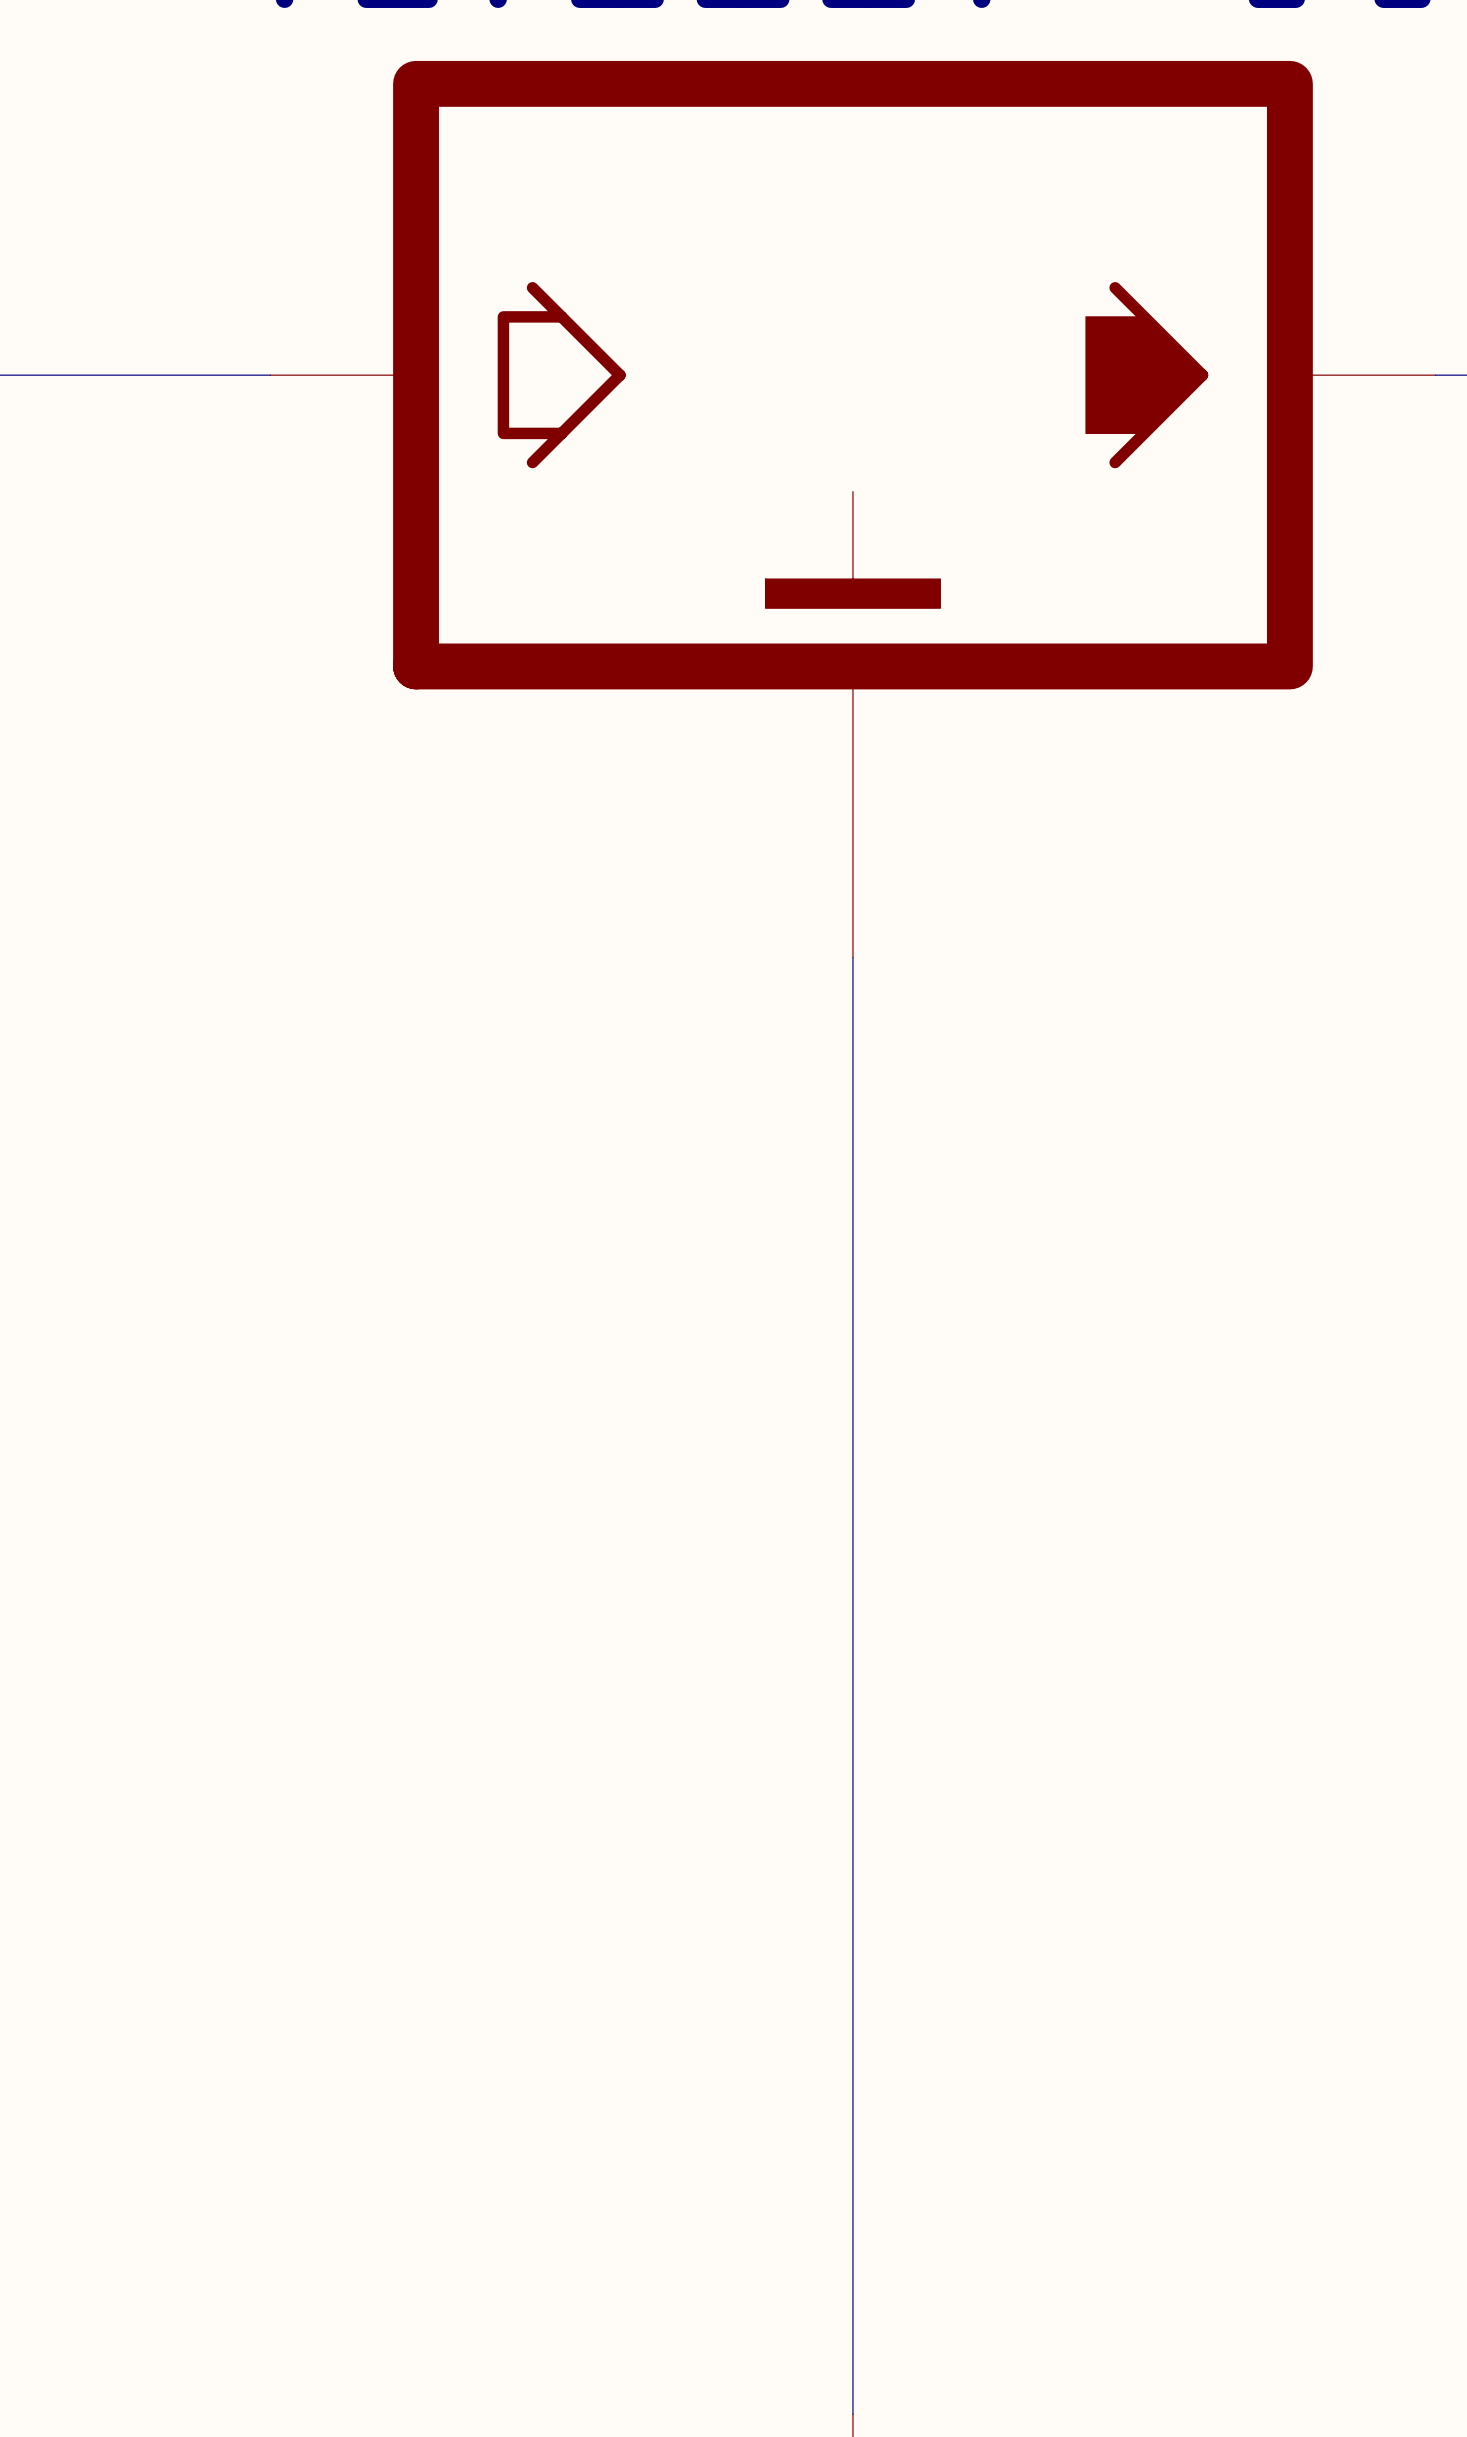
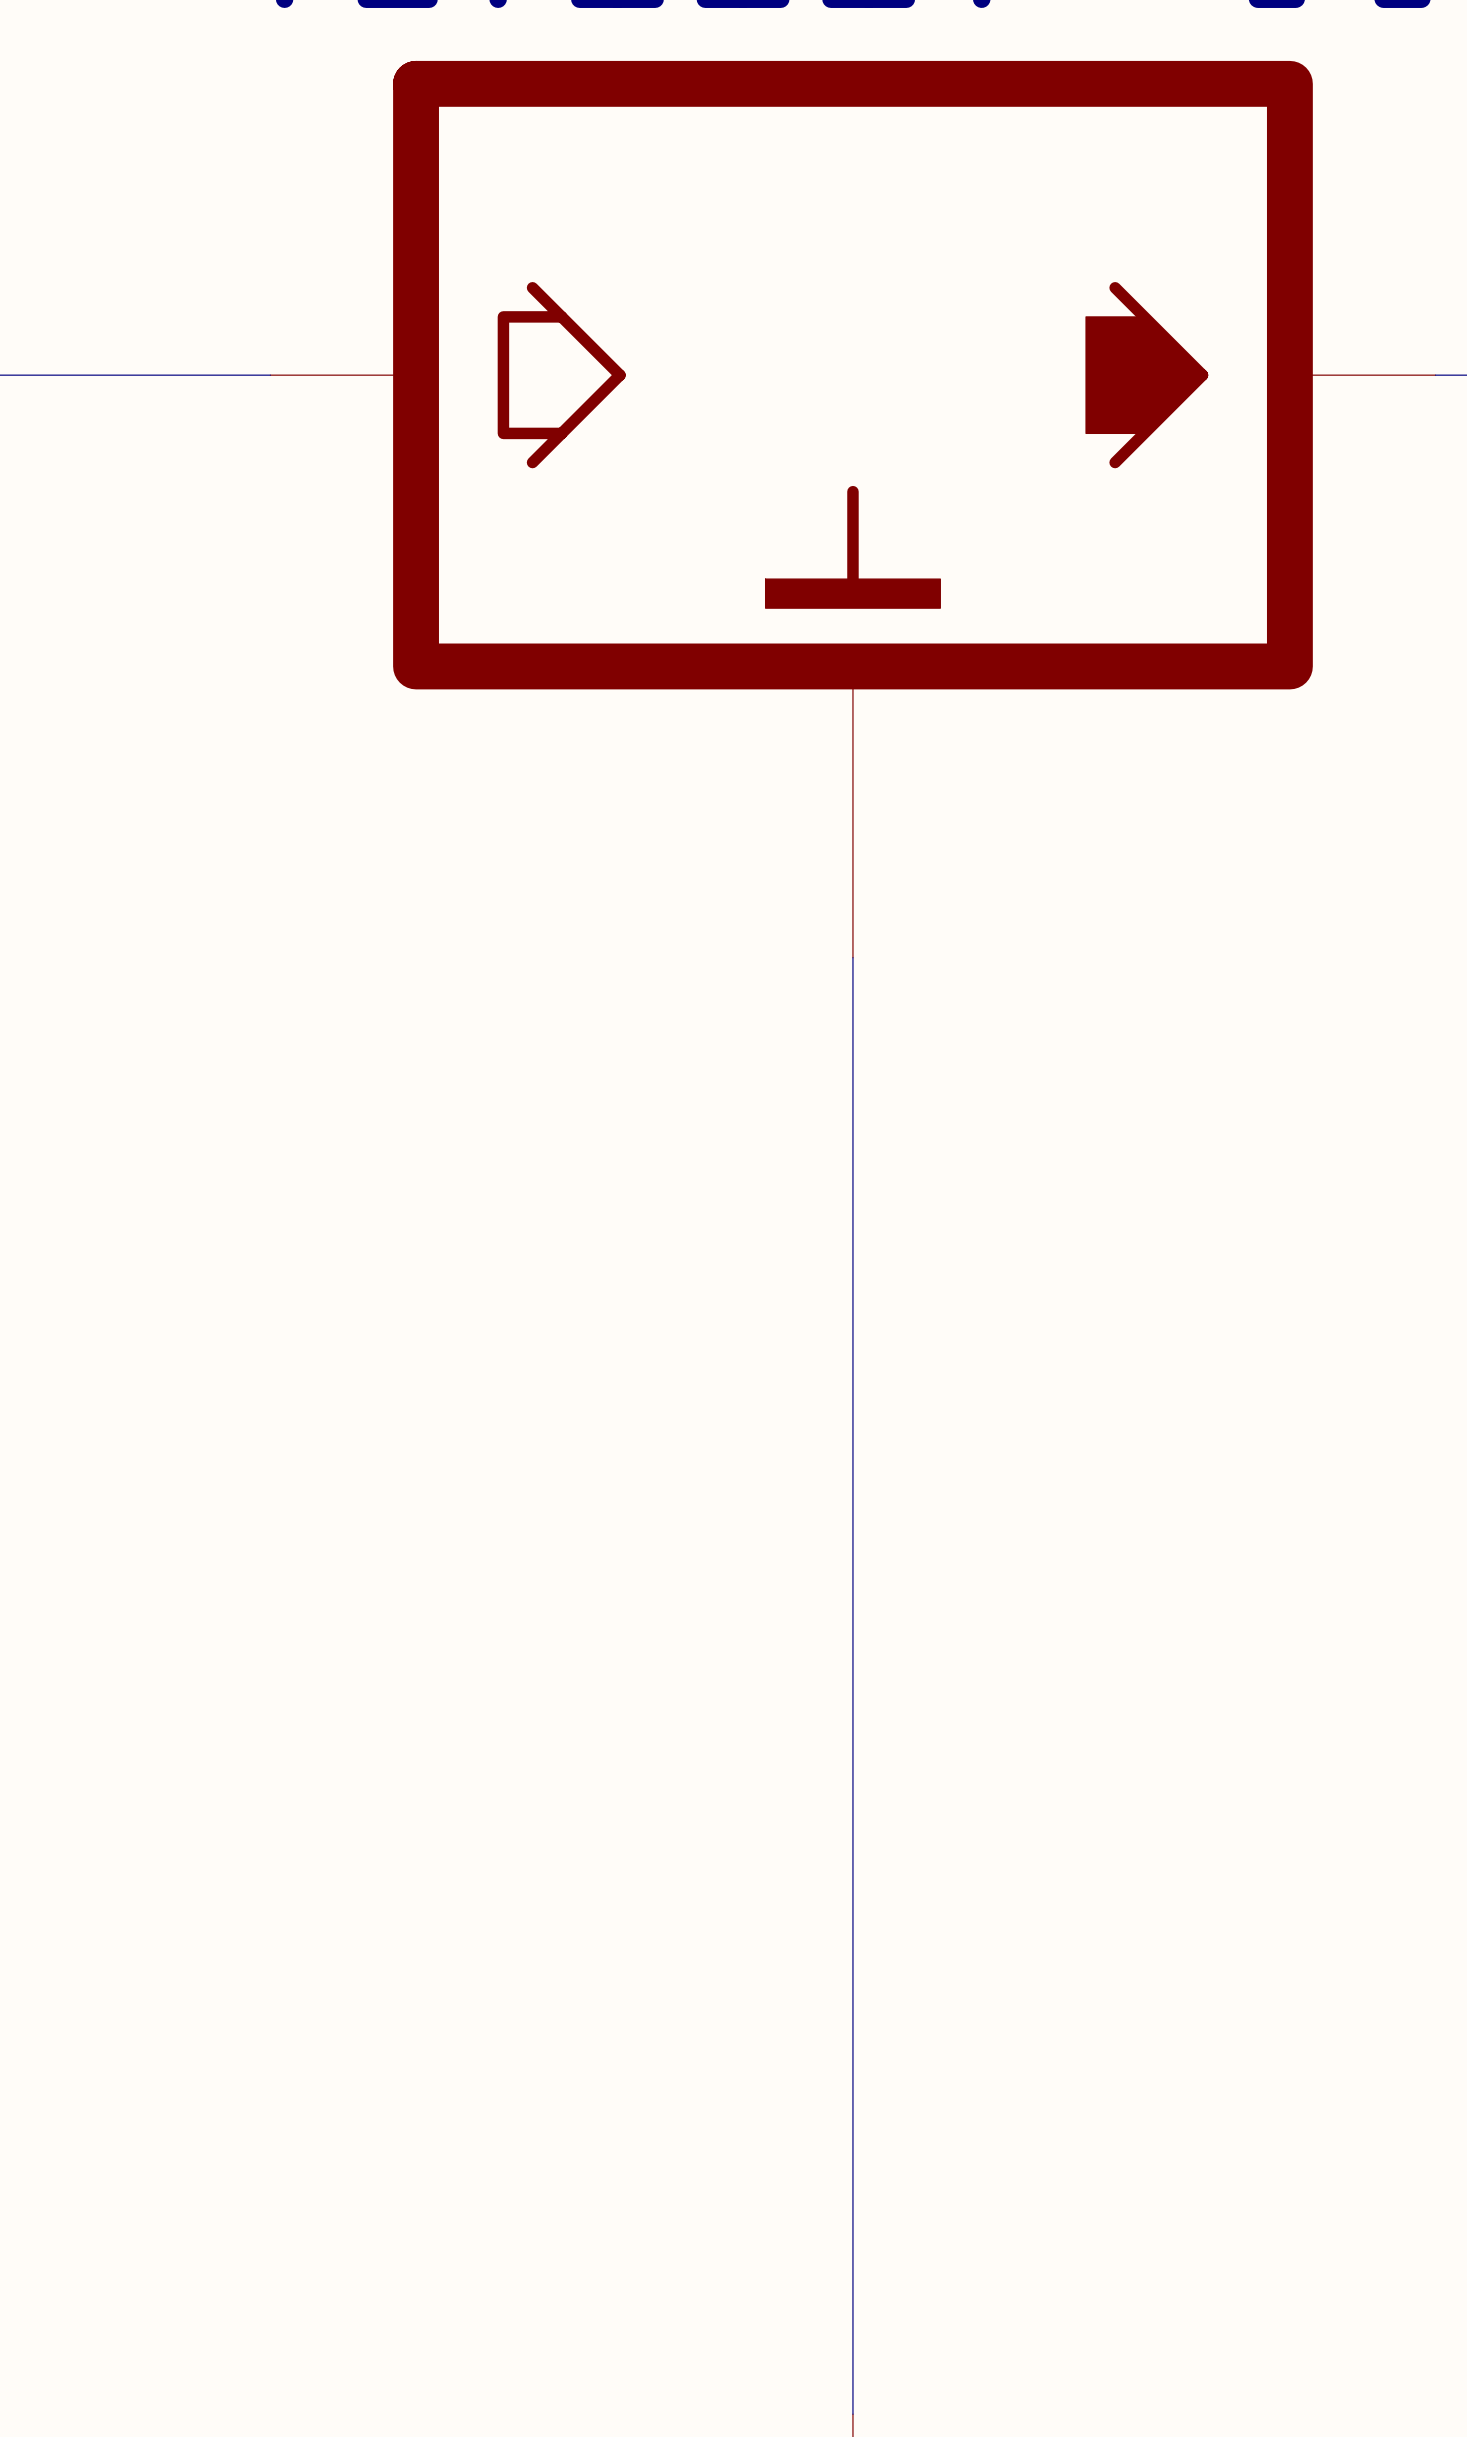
part symbol: [270, 60, 1436, 958] -> [270, 60, 1436, 958]

